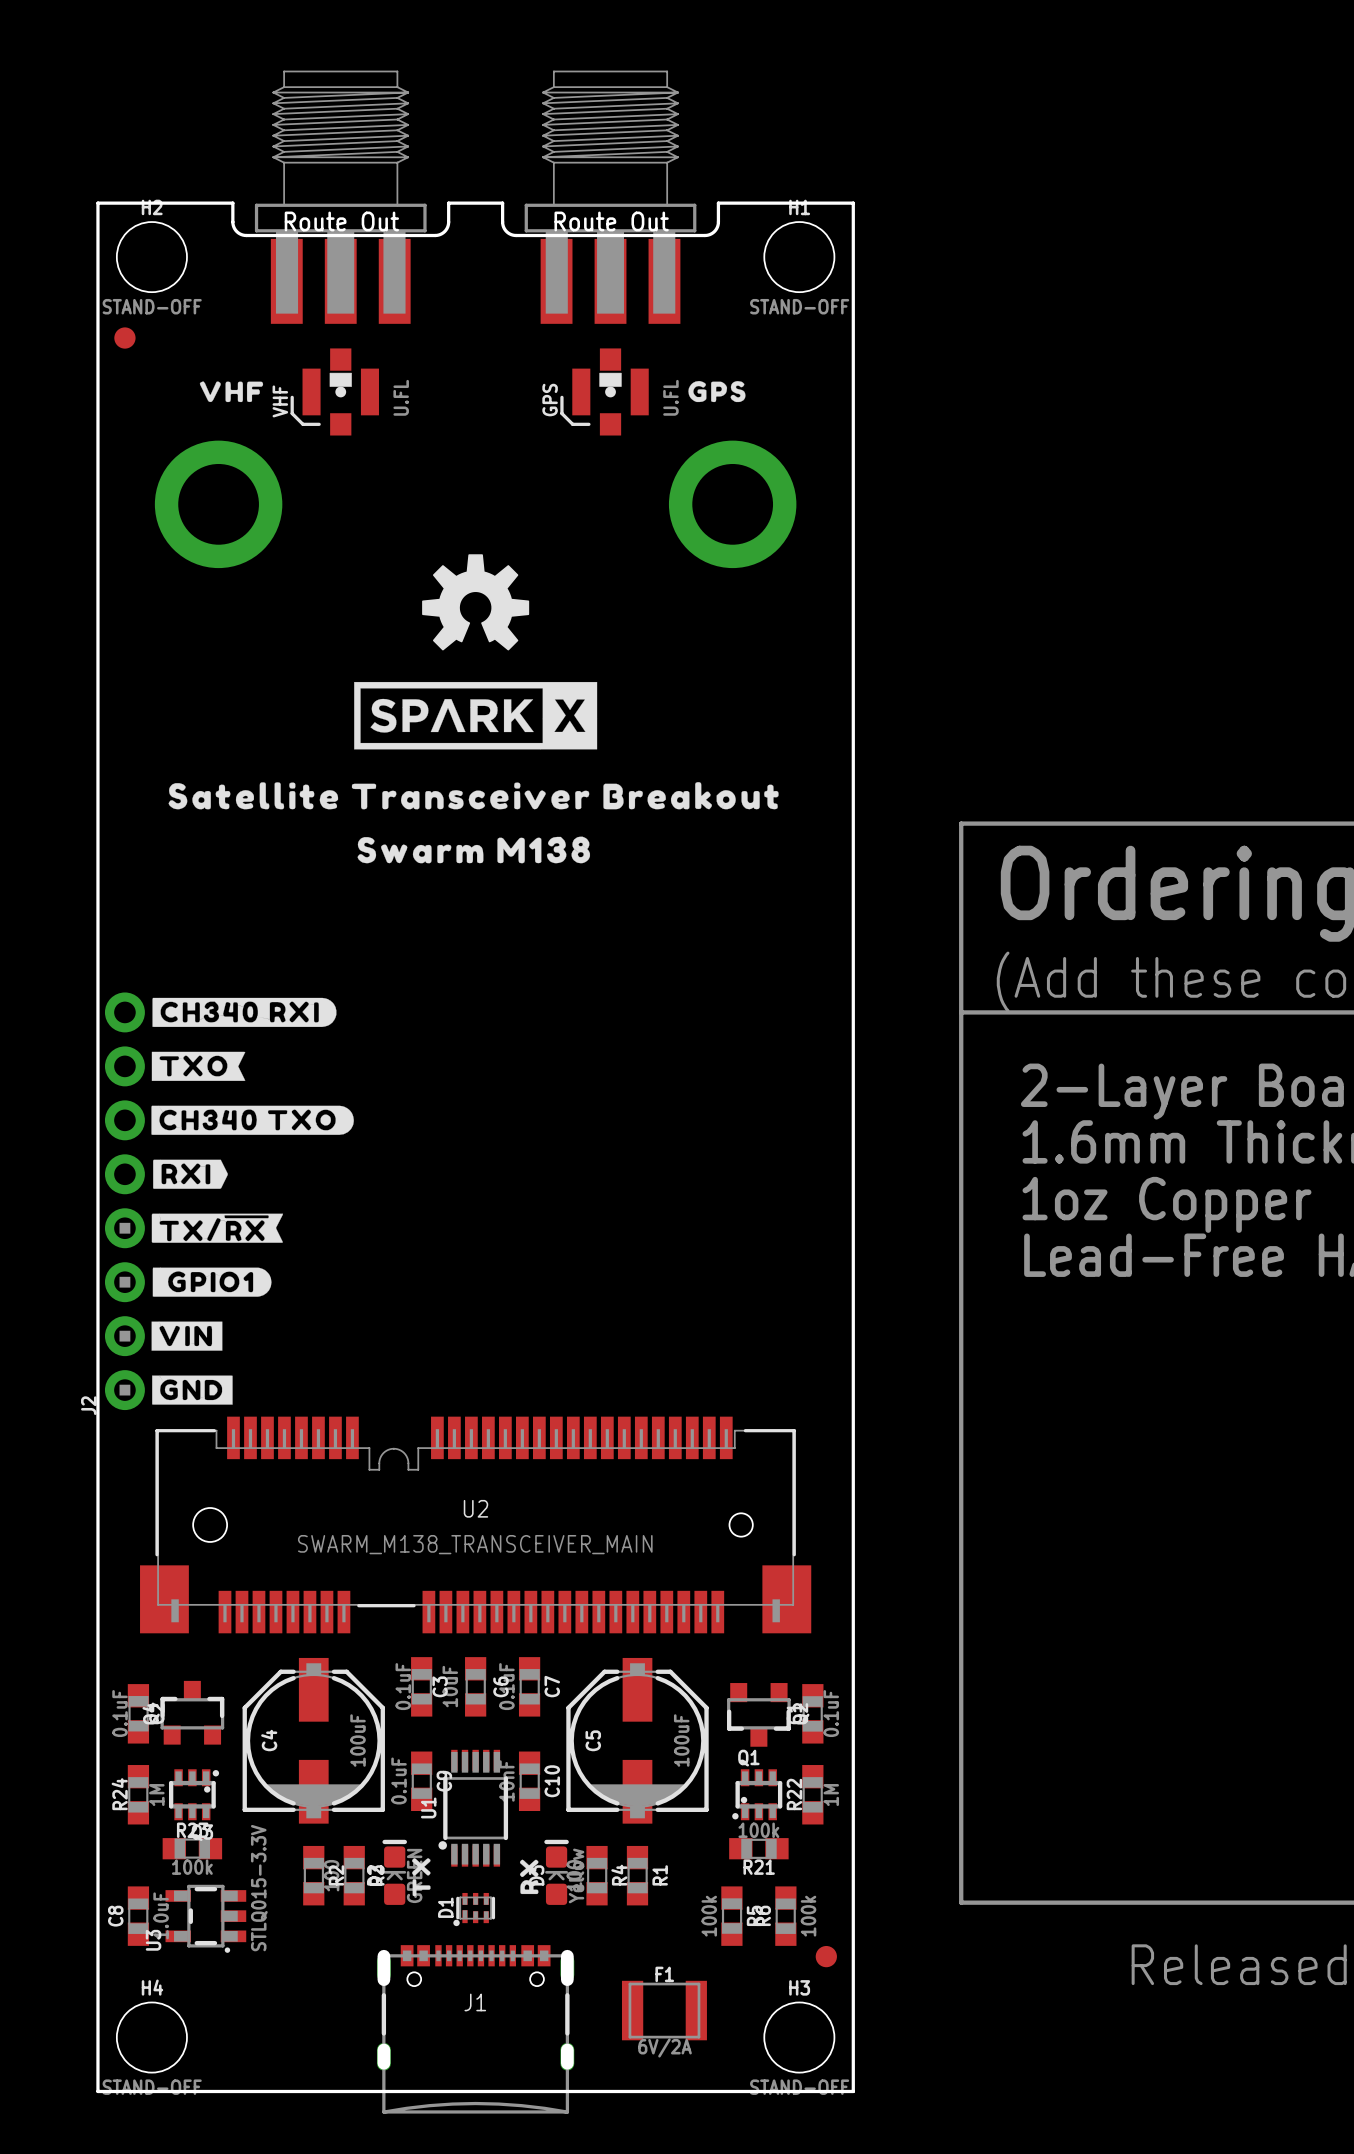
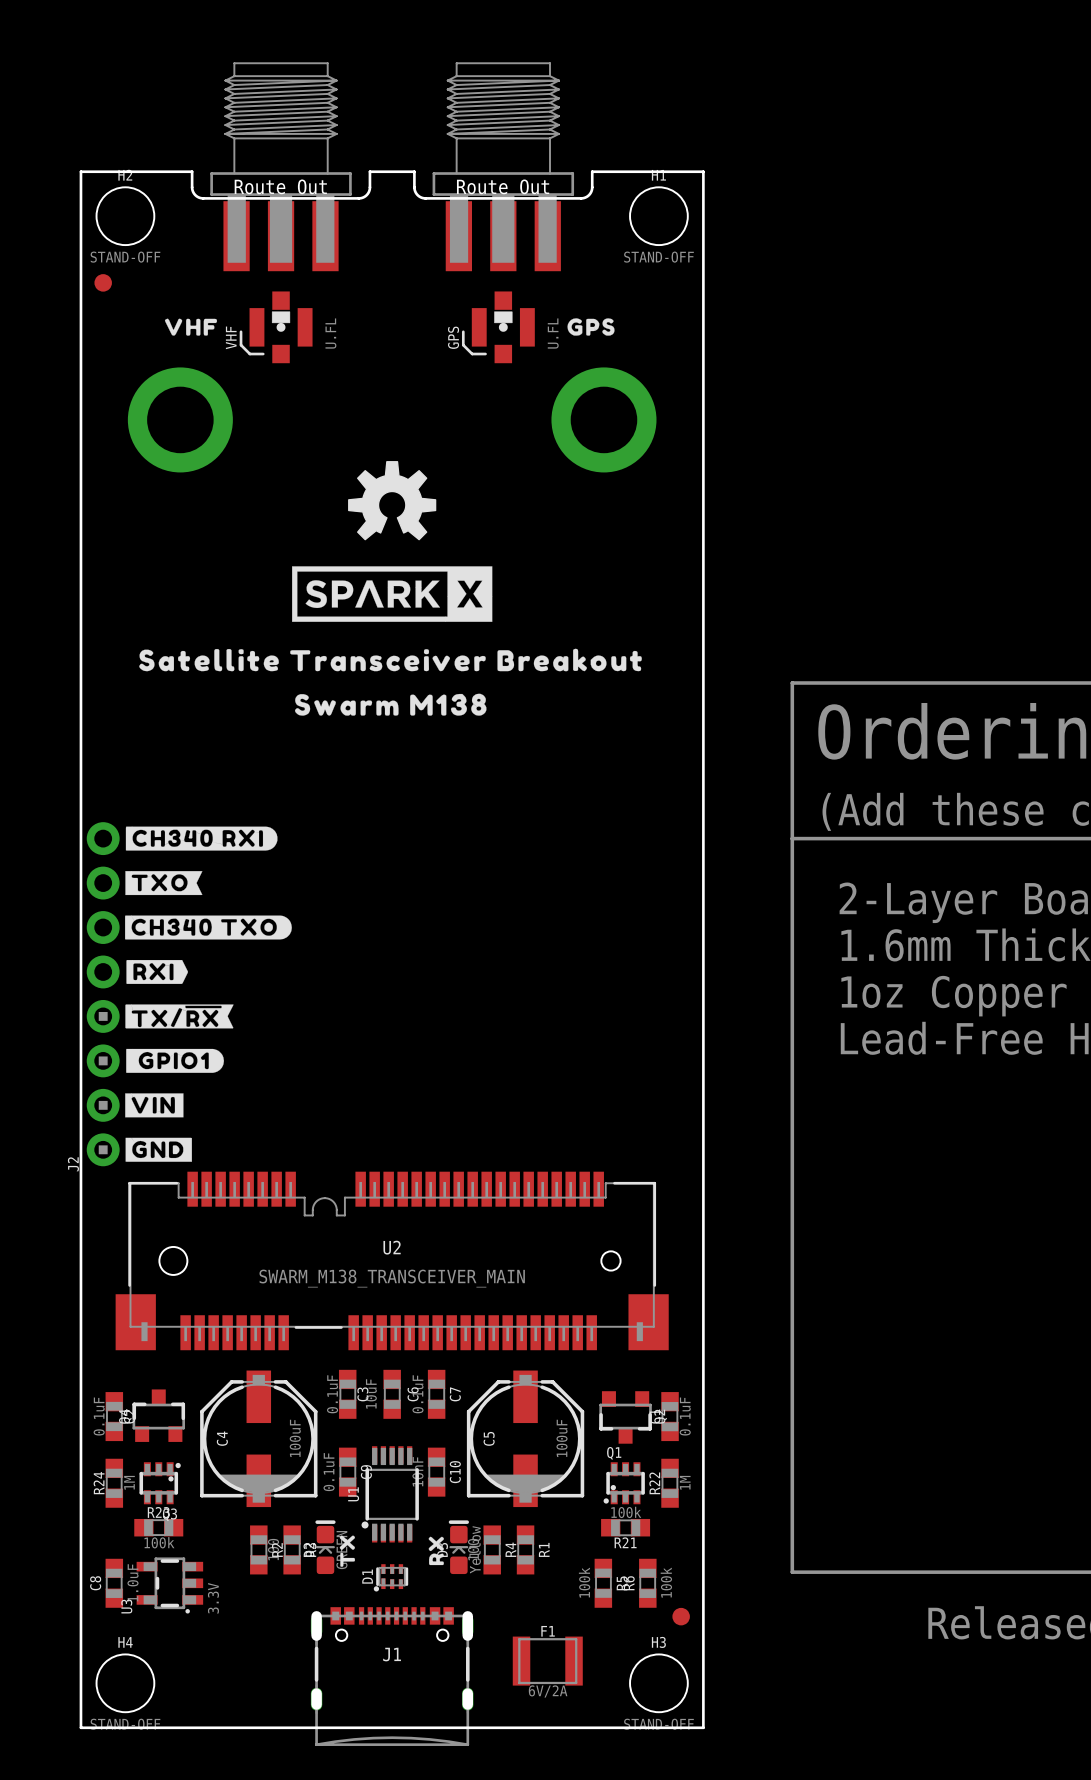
U3 value: STLQ015-3.3V (259, 1888) -> 3.3V (213, 1598)

